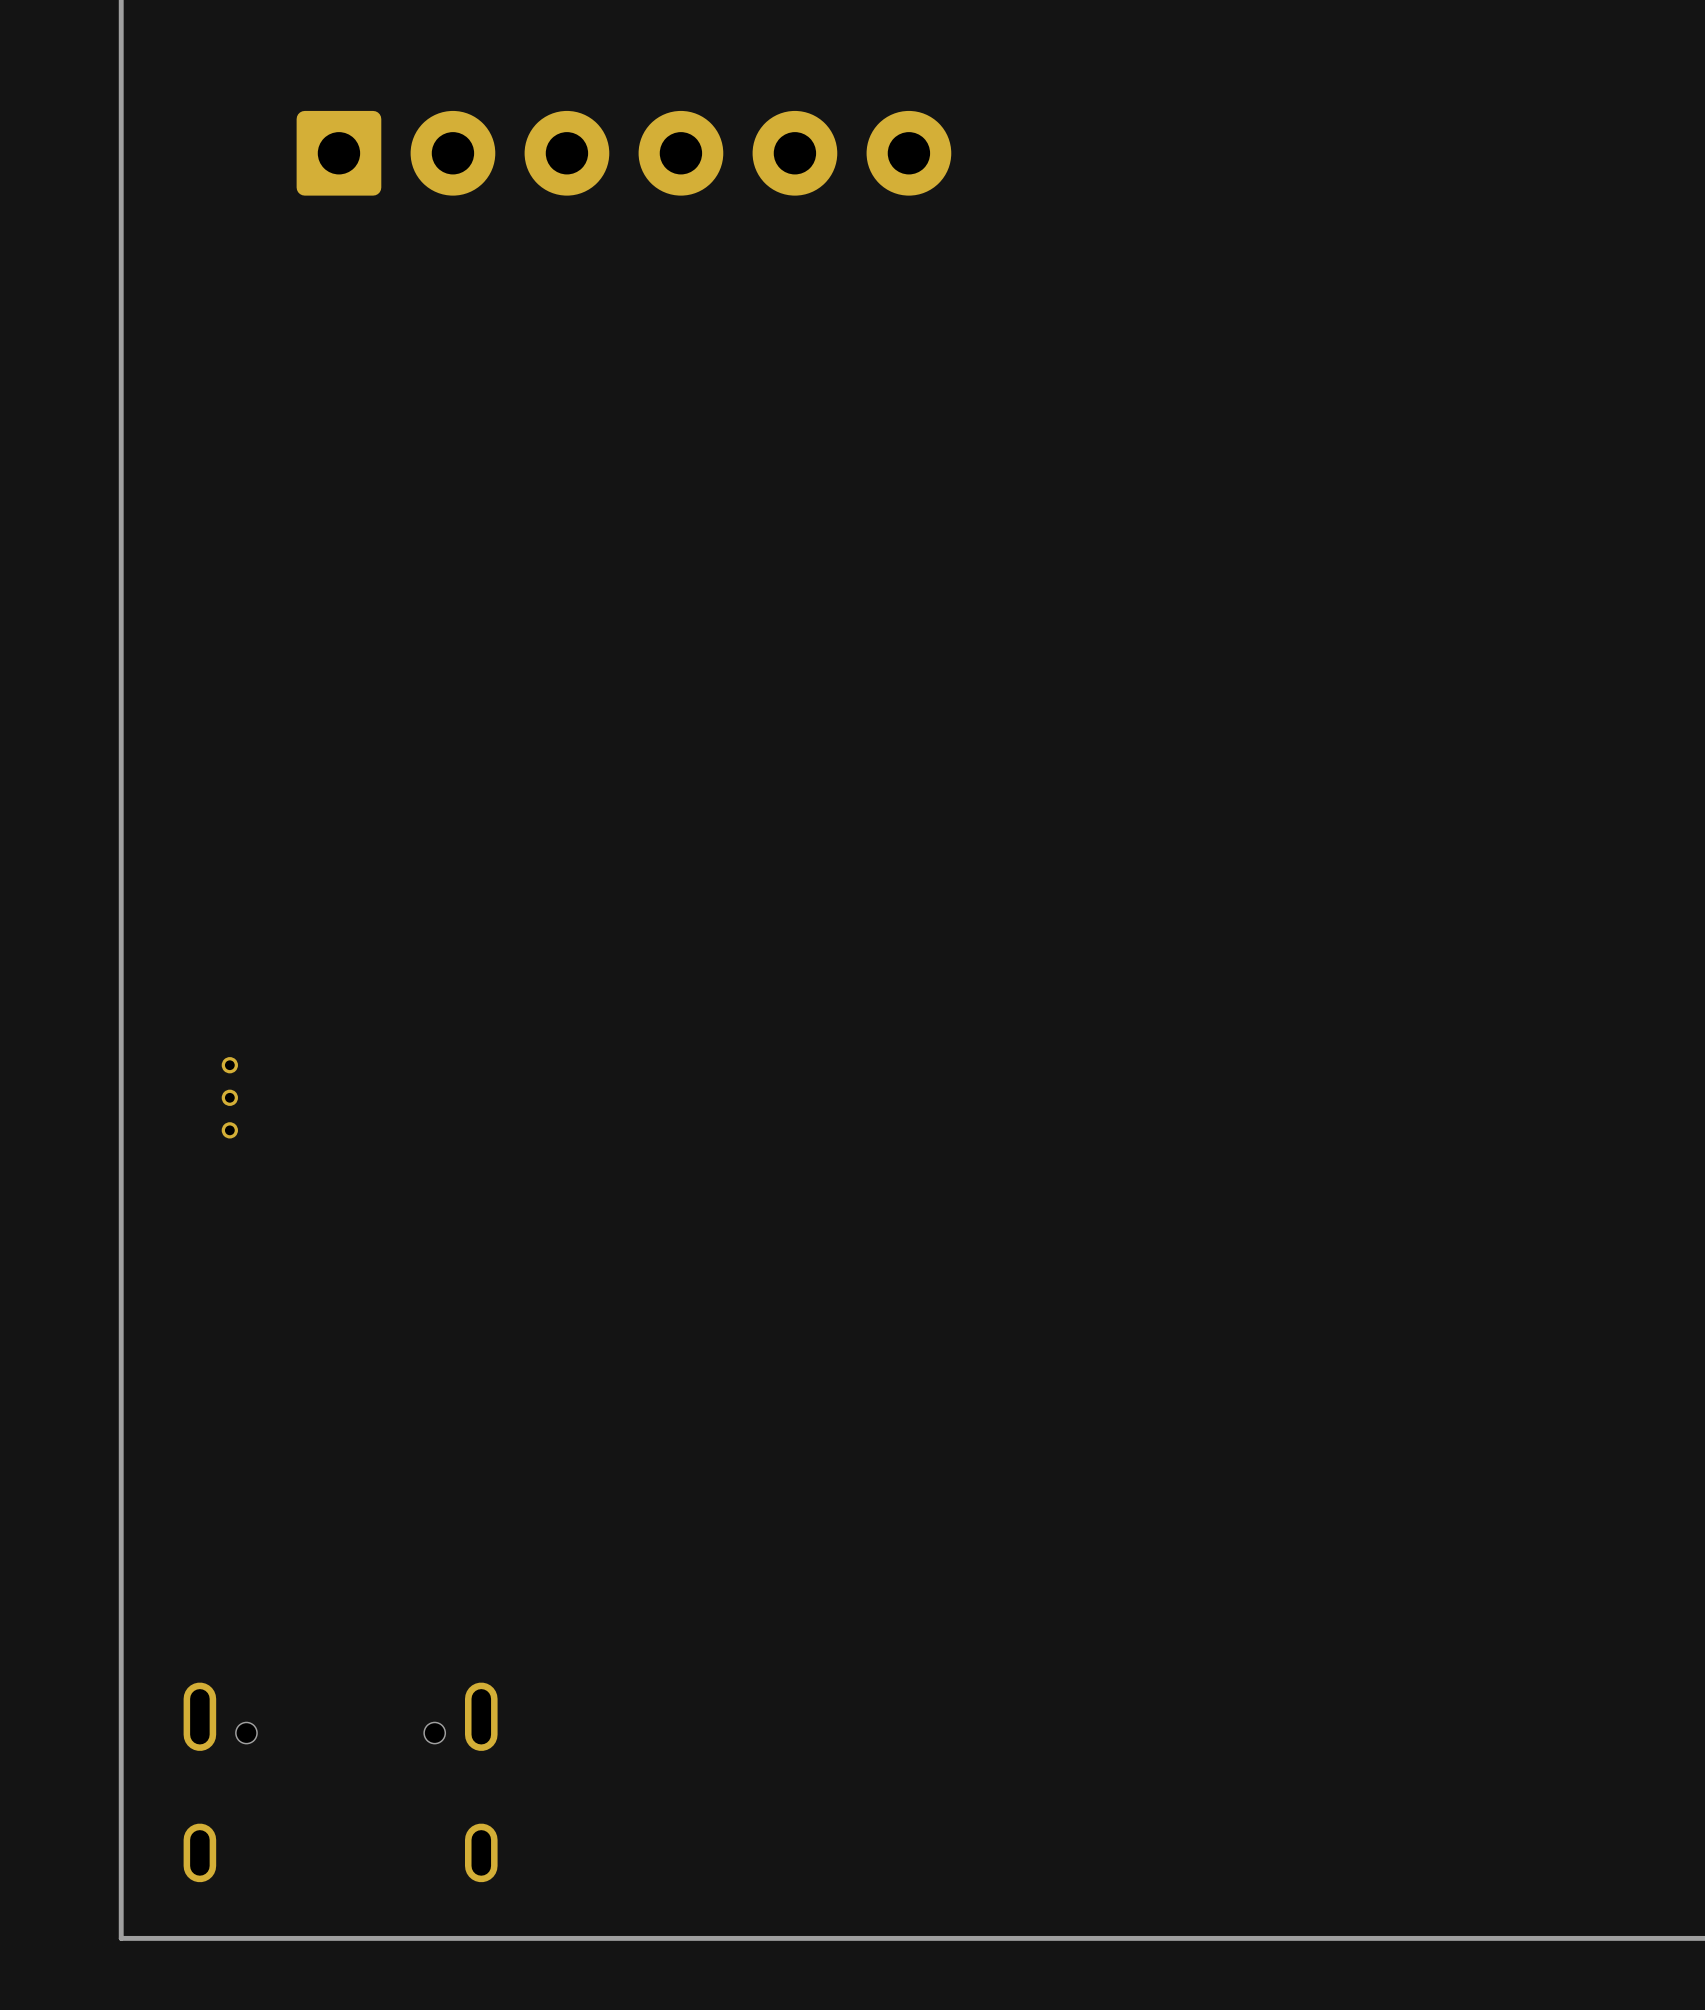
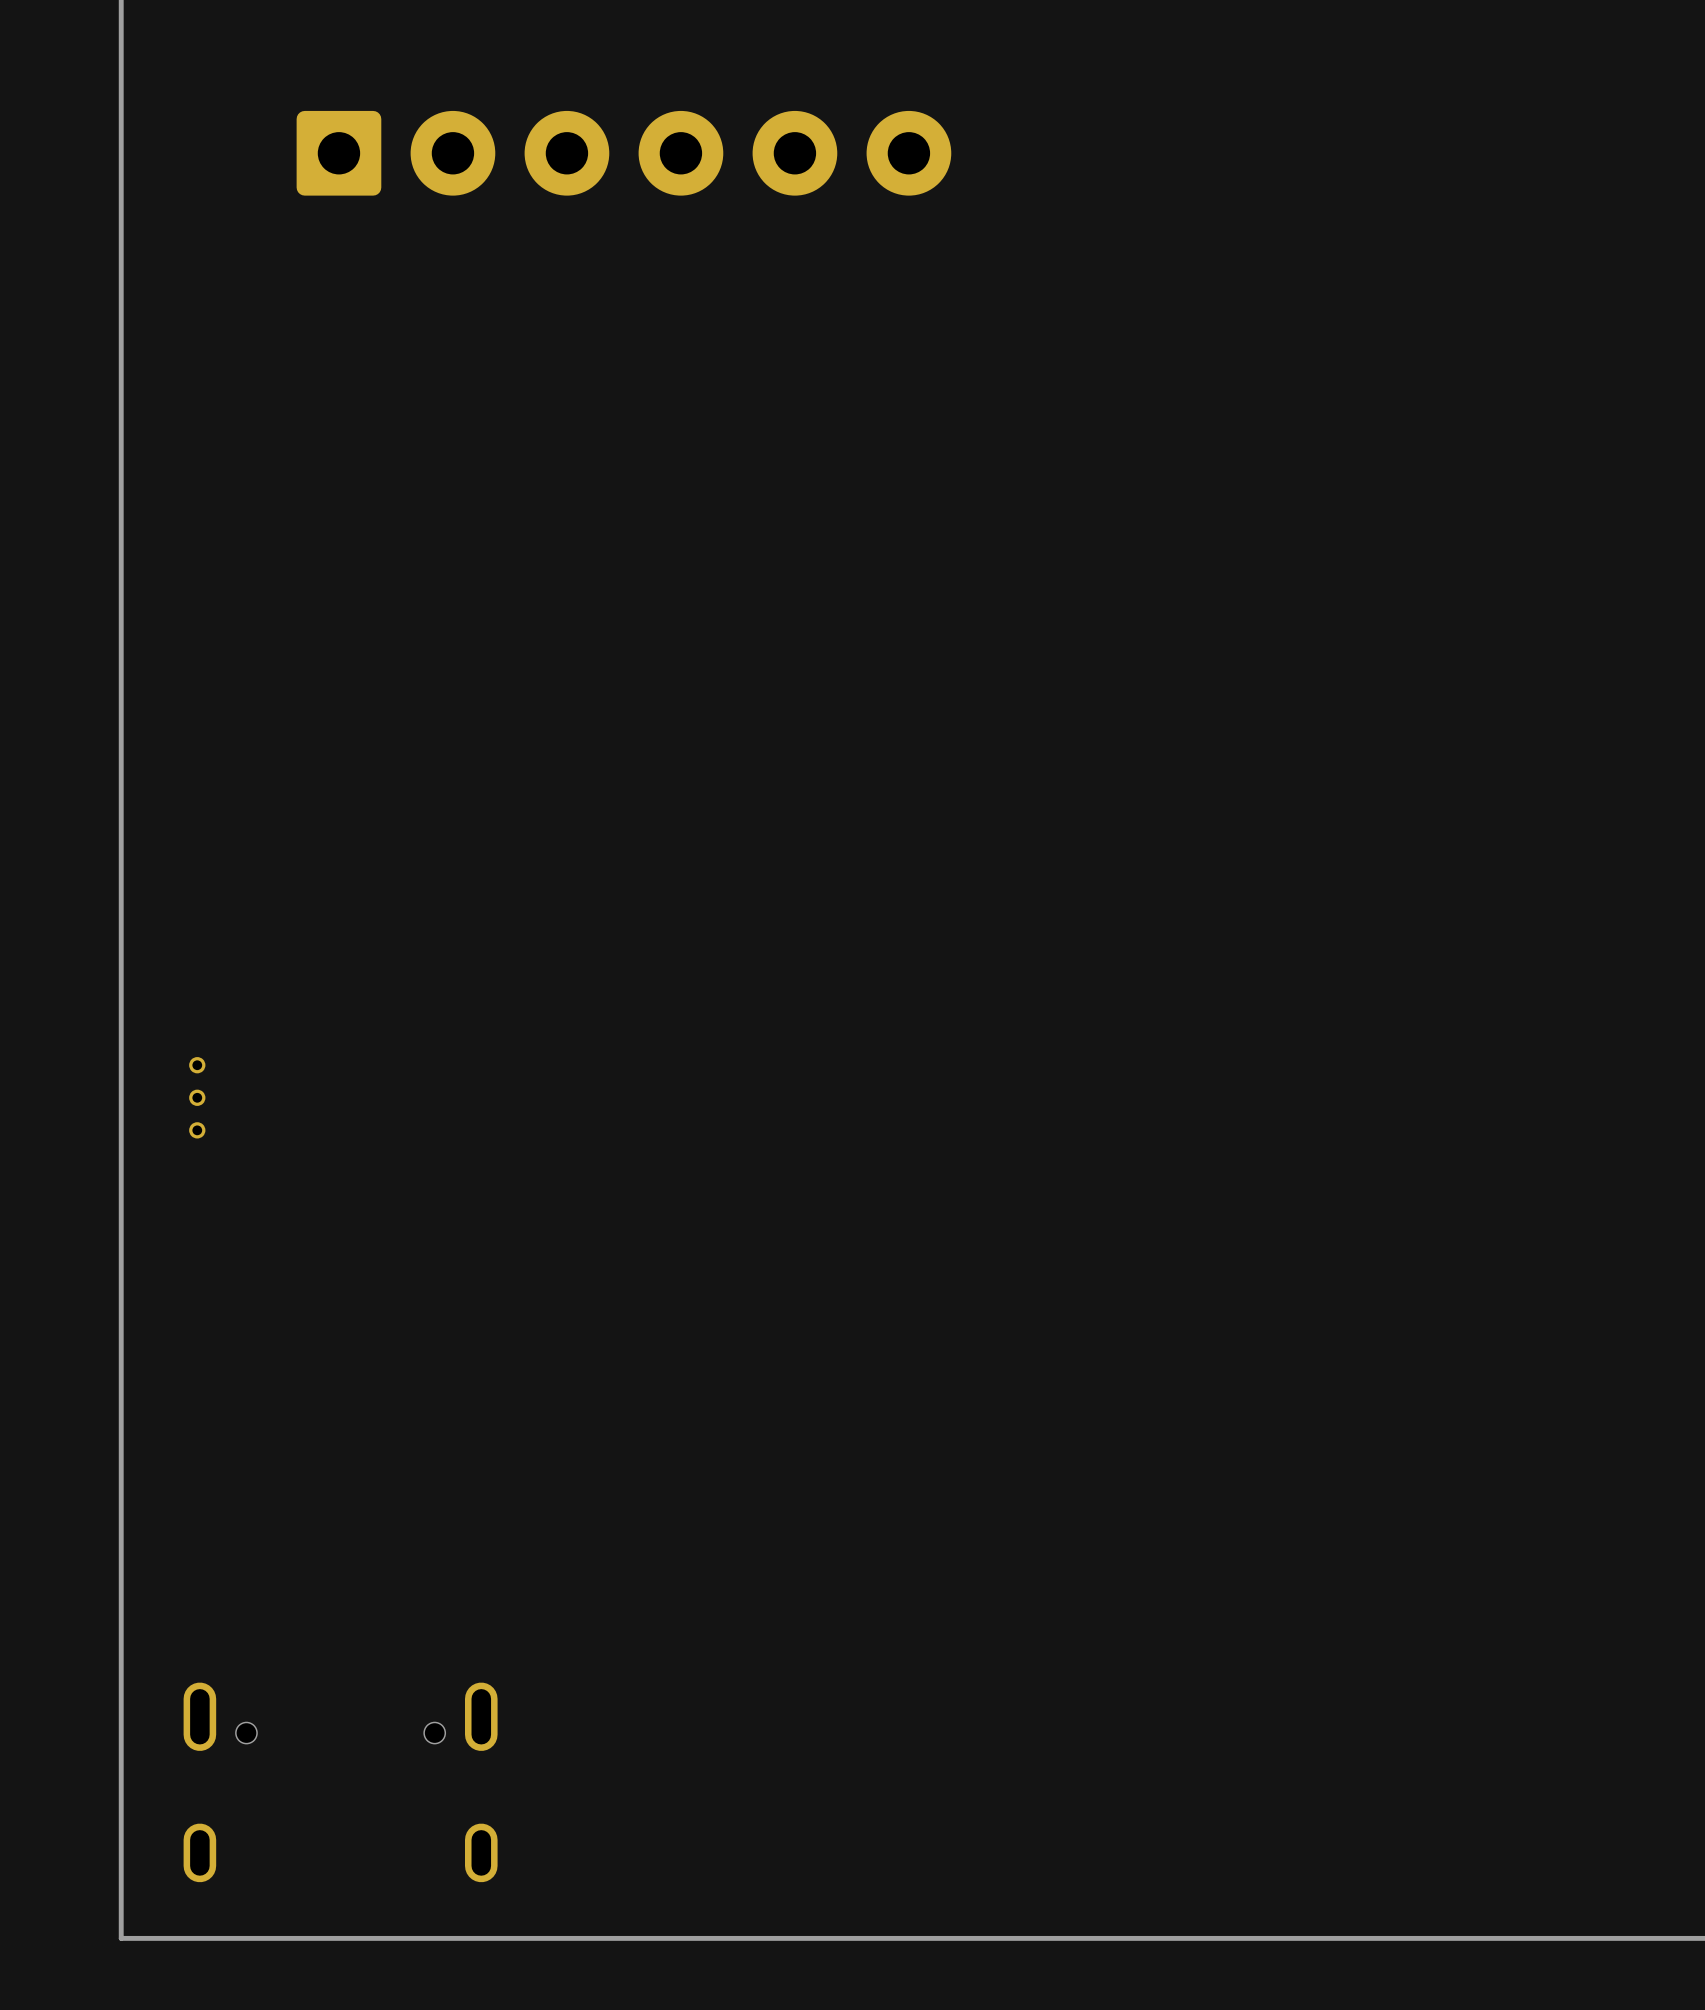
part position: (229, 1097) -> (197, 1097)

